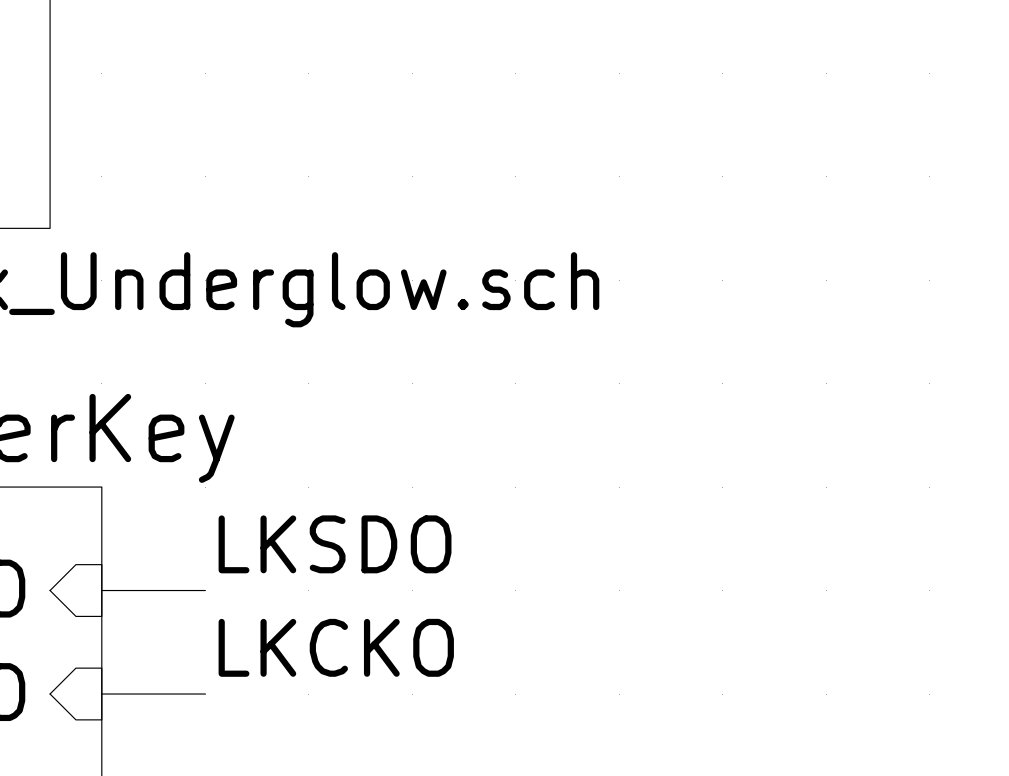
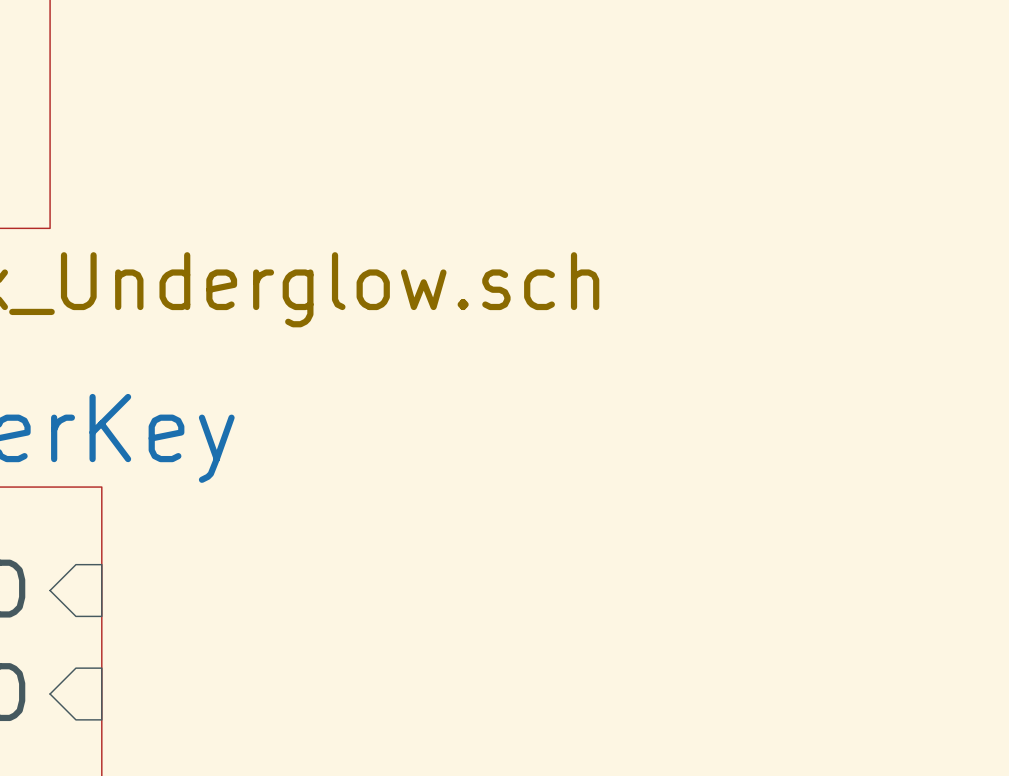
label: LKSDO (335, 544) -> none
wire: (101, 590) (205, 590) -> none
label: LKCKO (336, 647) -> none
wire: (101, 694) (205, 694) -> none

